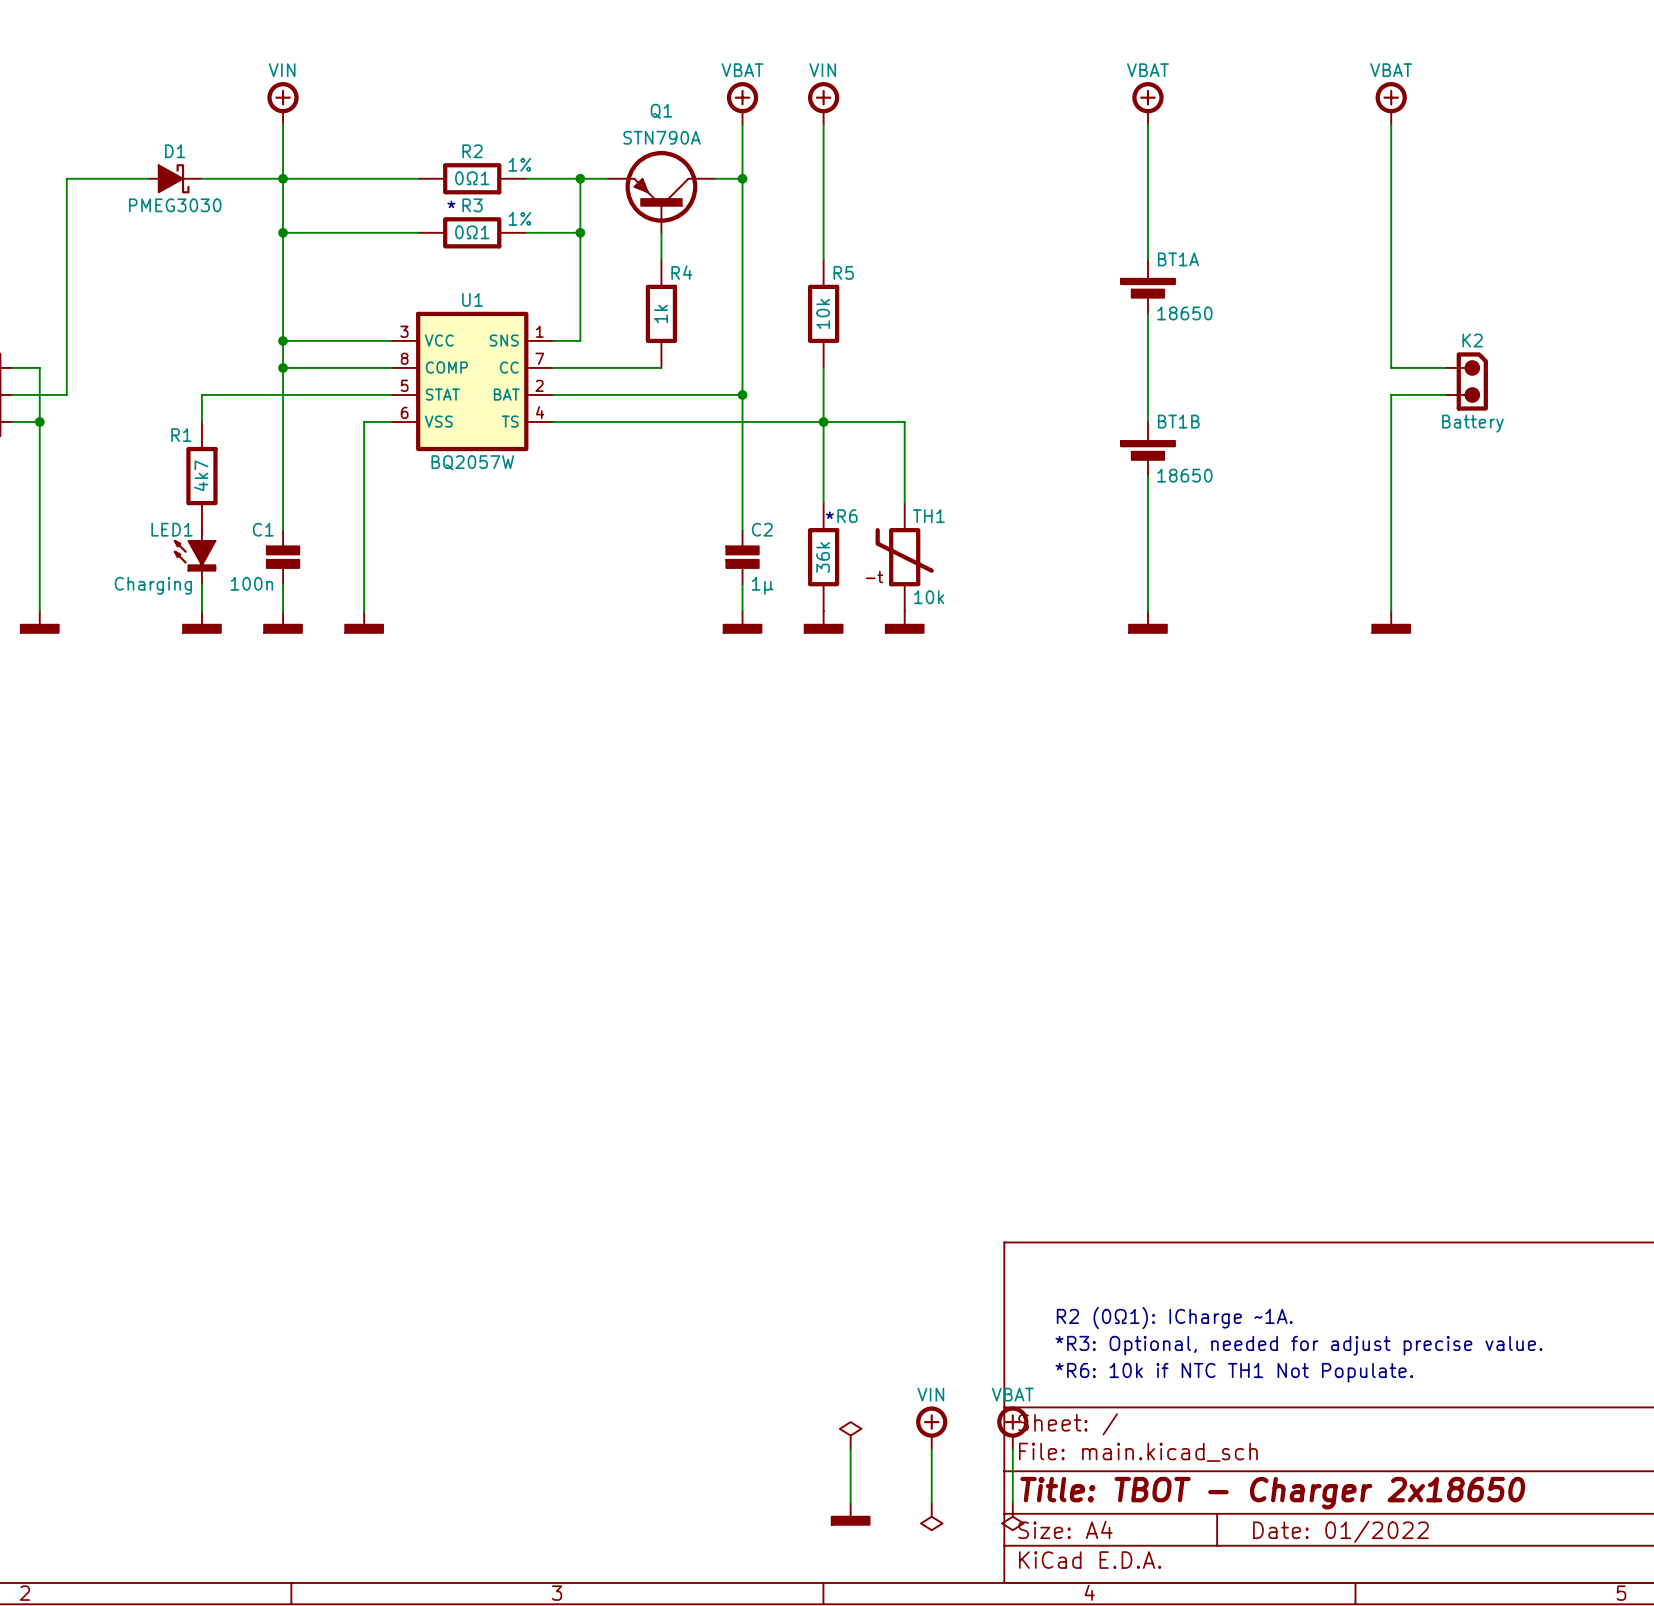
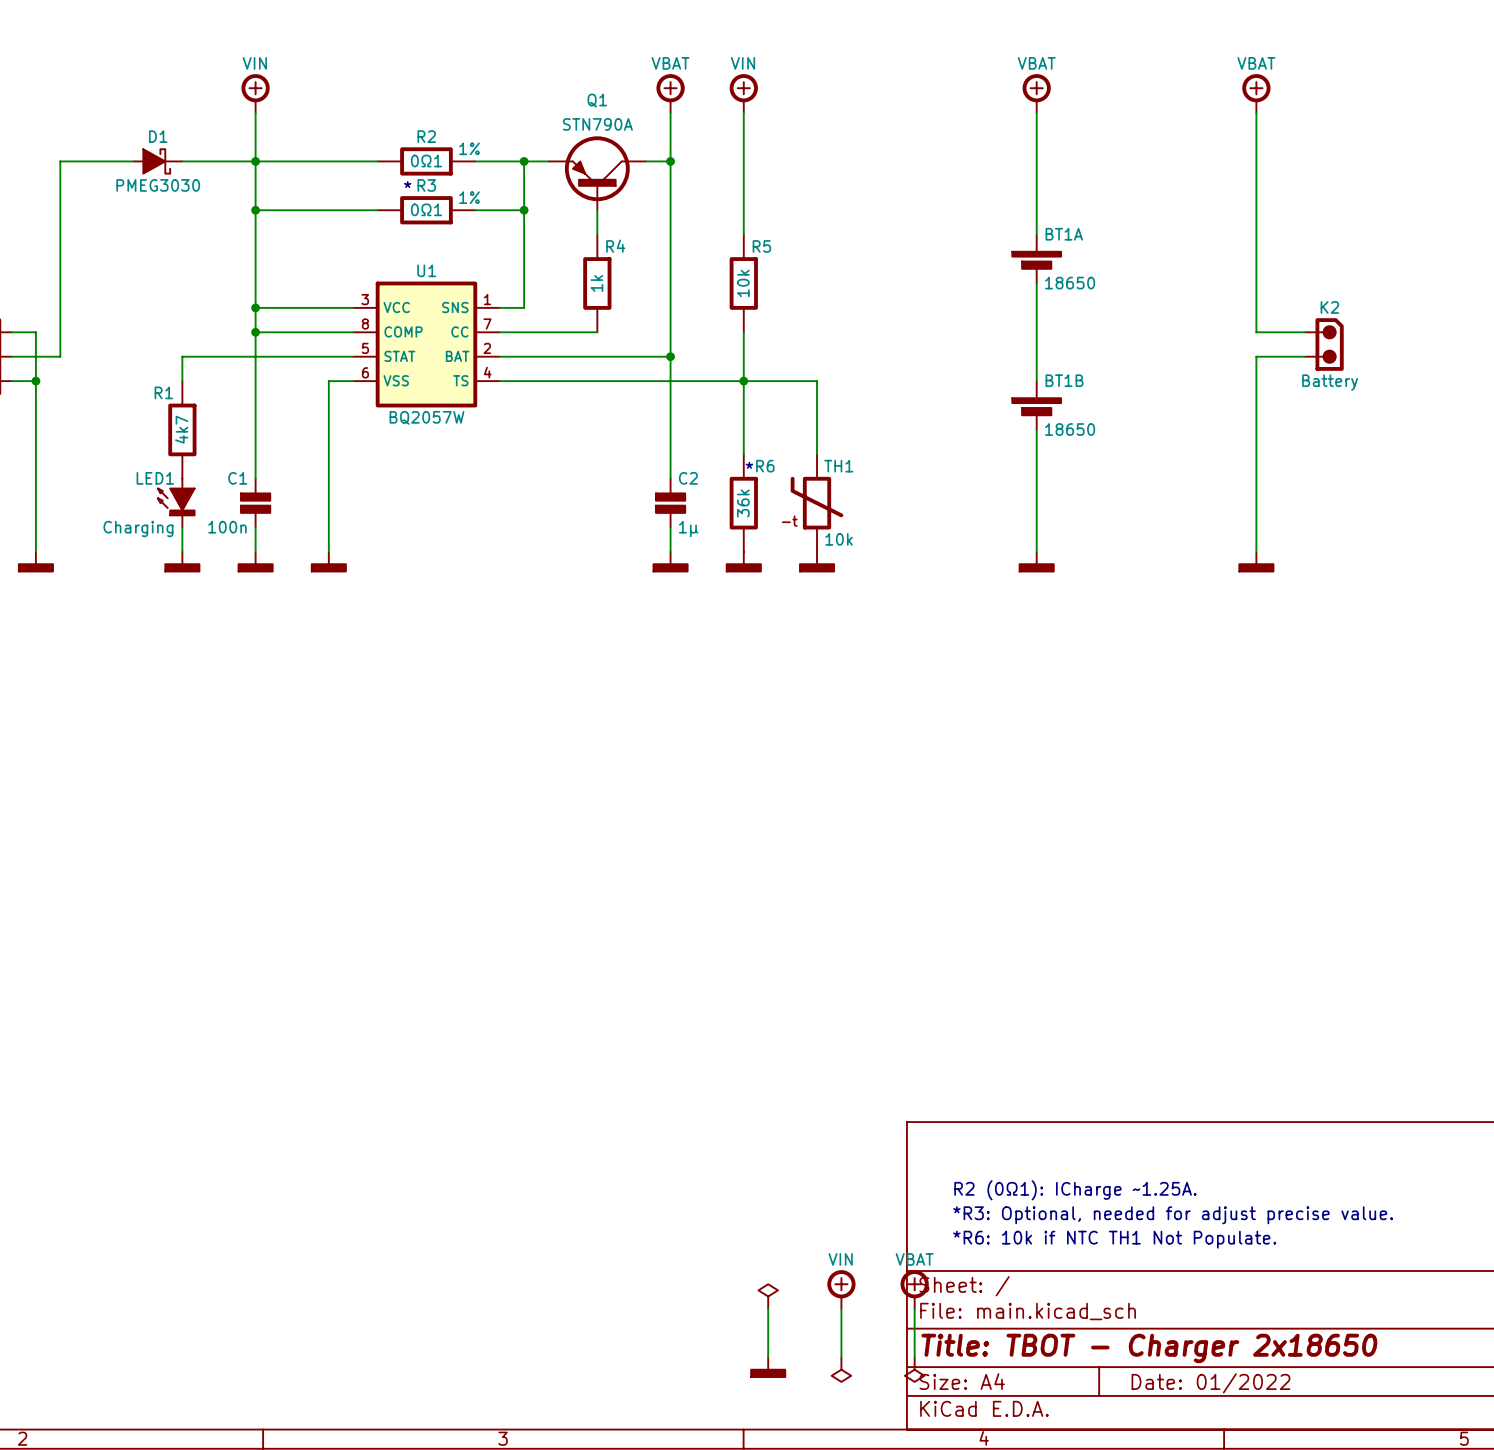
text: R2 (0Ω1): ICharge ~1A. (1174, 1318) -> R2 (0Ω1): ICharge ~1.25A. (1075, 1190)

